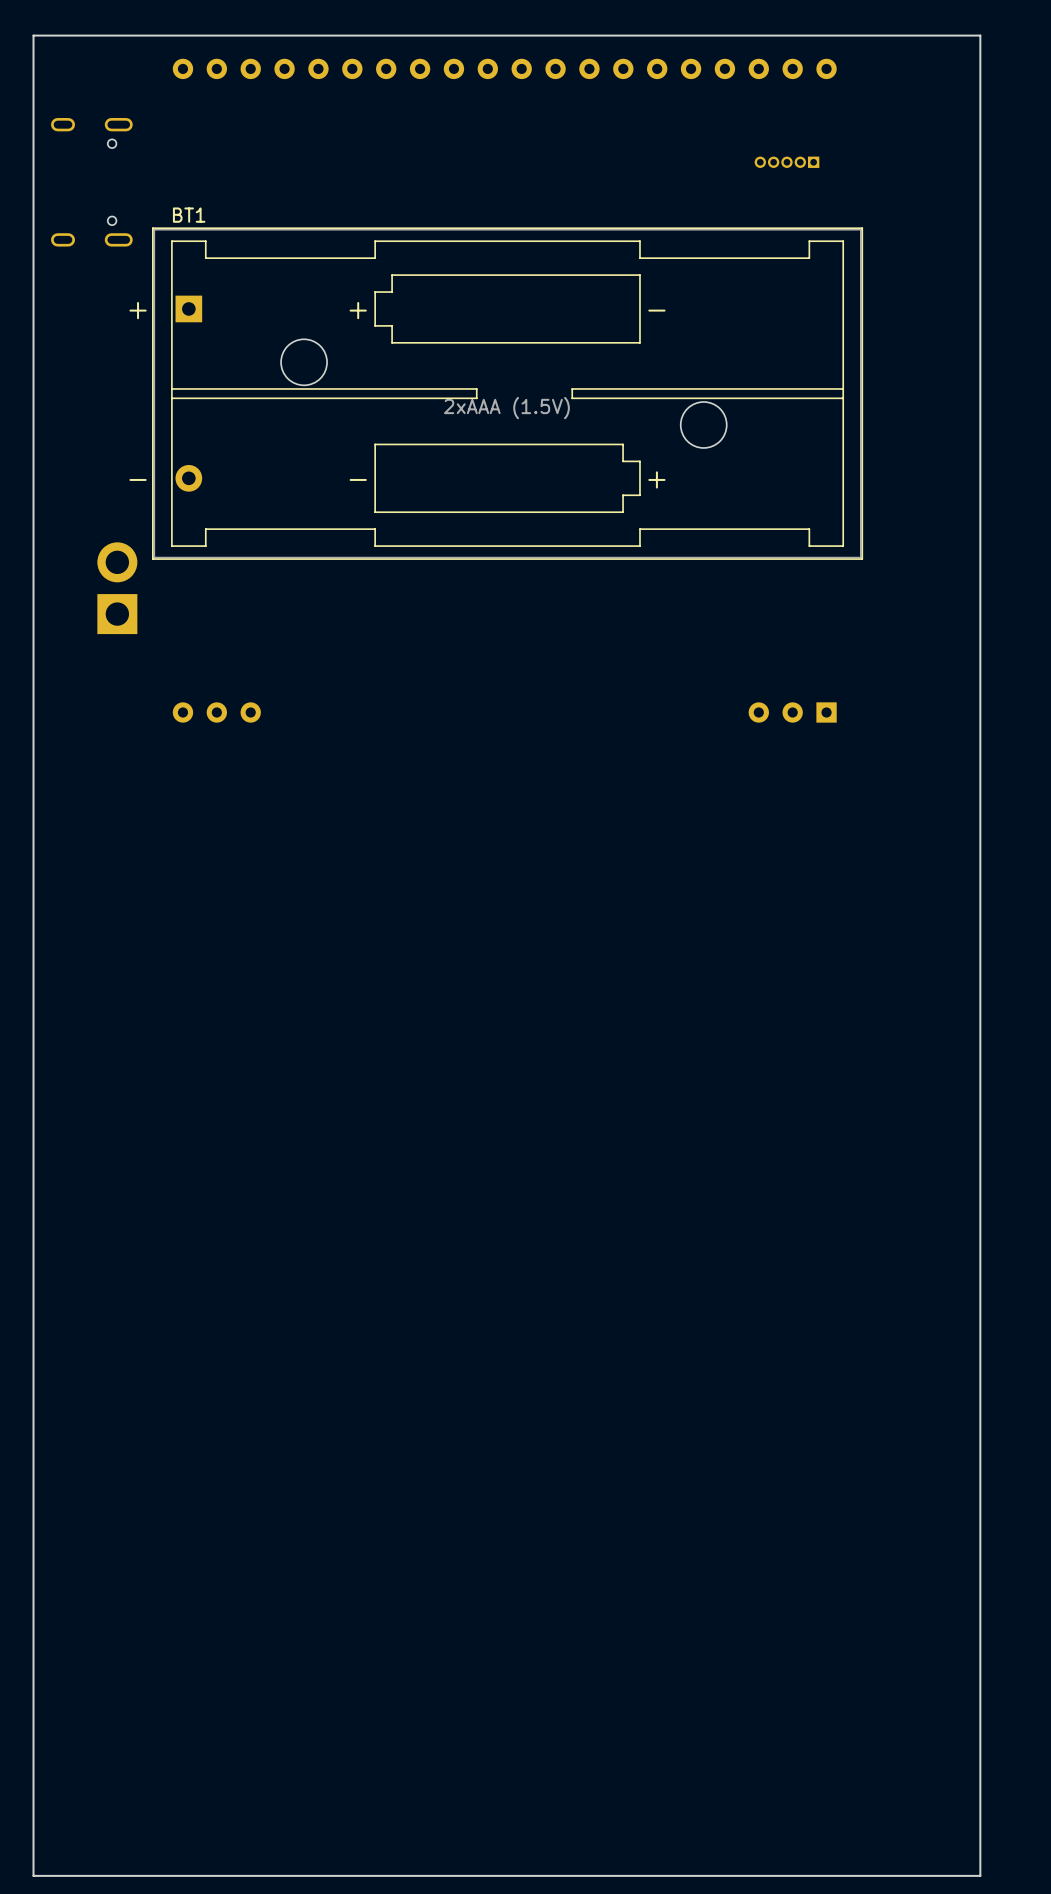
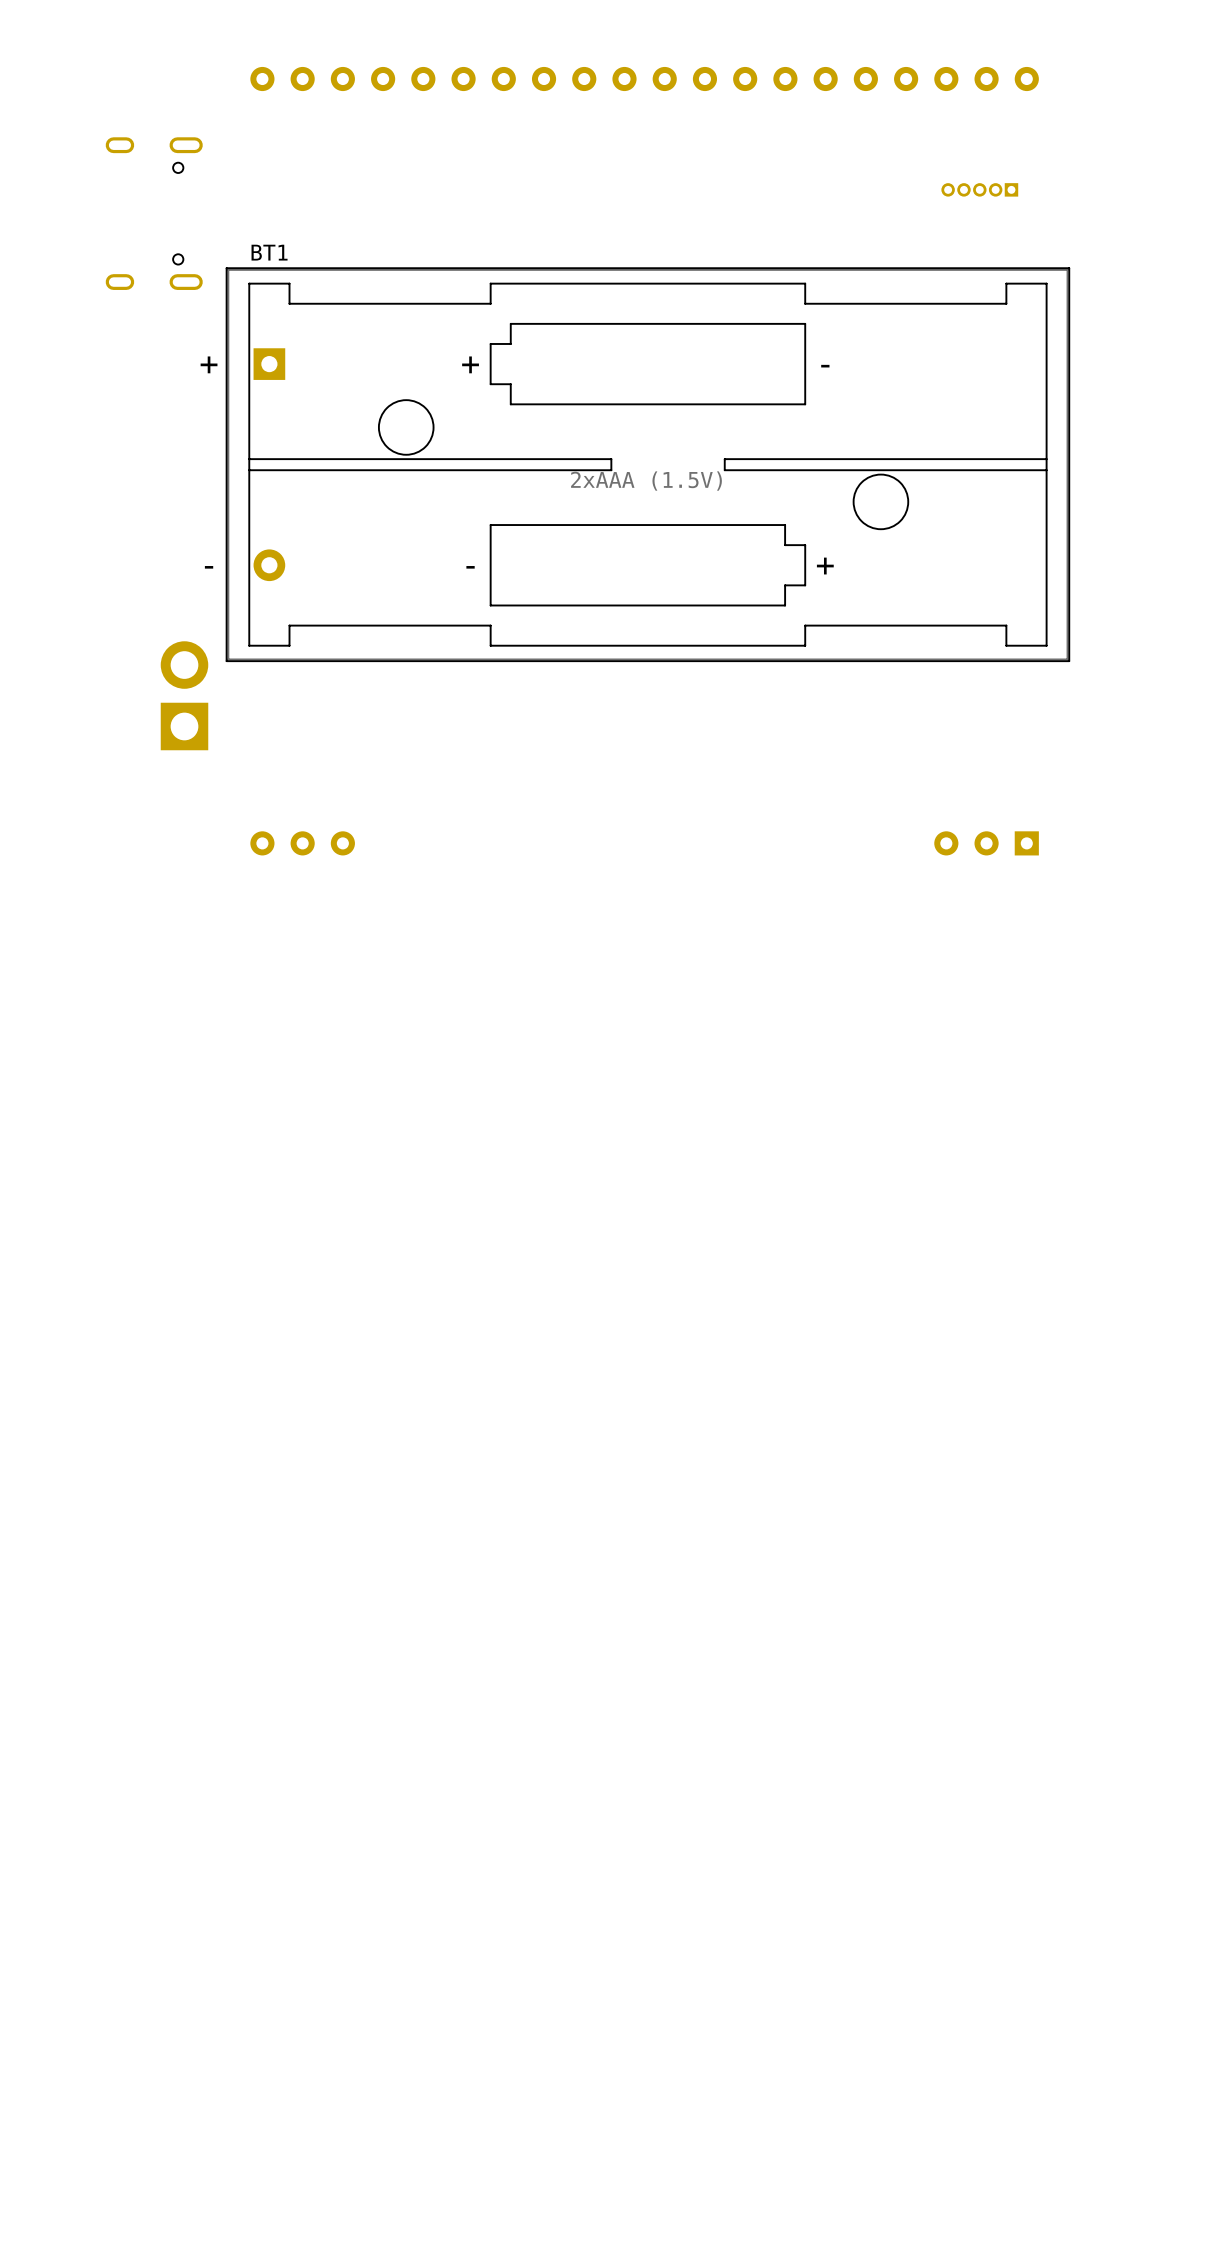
board edge: (980, 35) (980, 1875) (33, 1875) (33, 35) (980, 35) -> none

